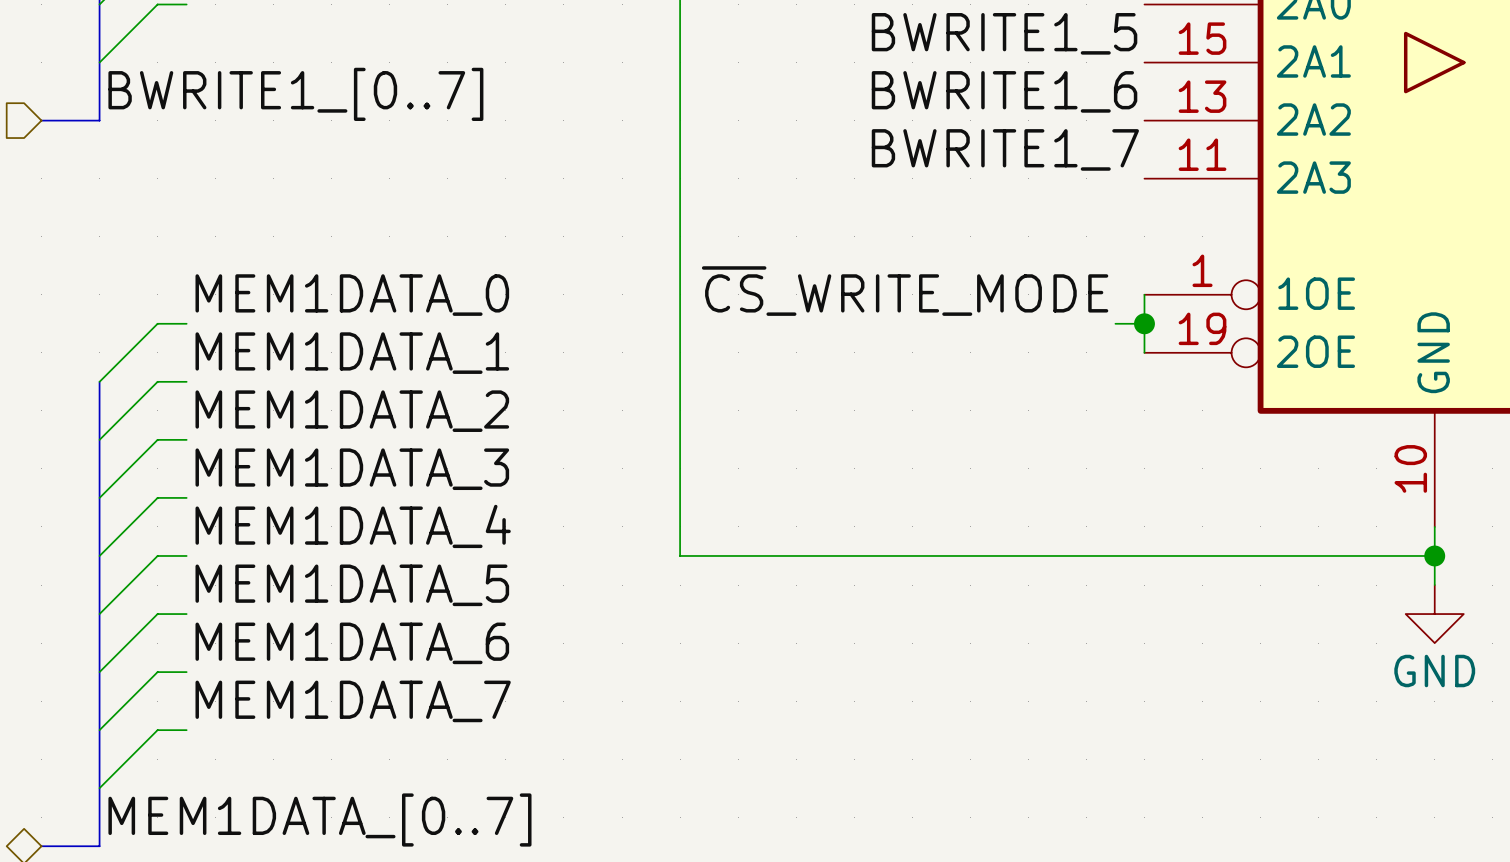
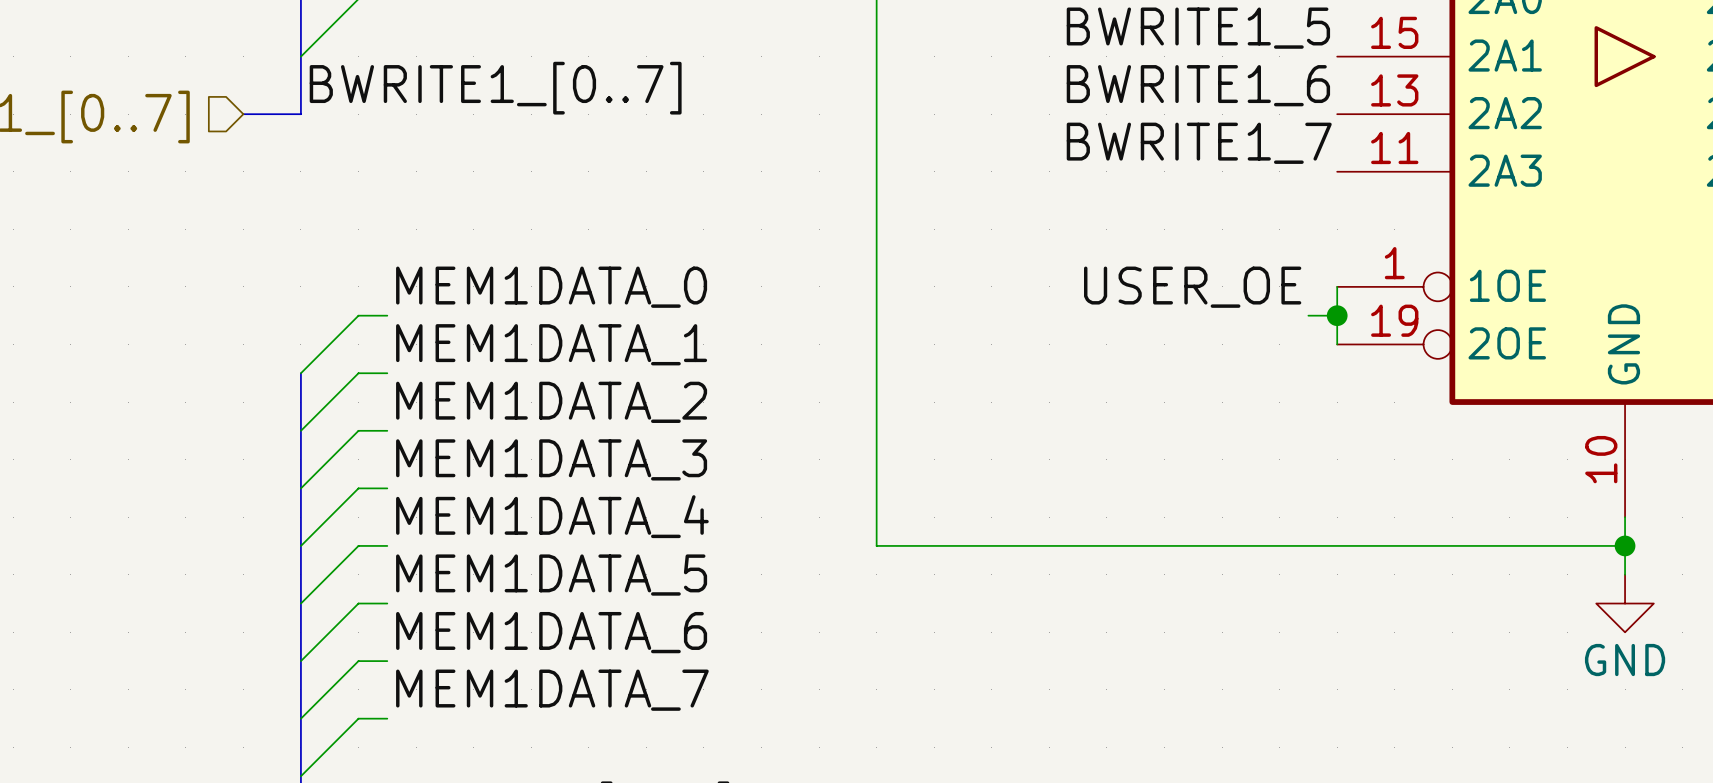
label: ~{CS}_WRITE_MODE (905, 291) -> USER_OE (1192, 287)

